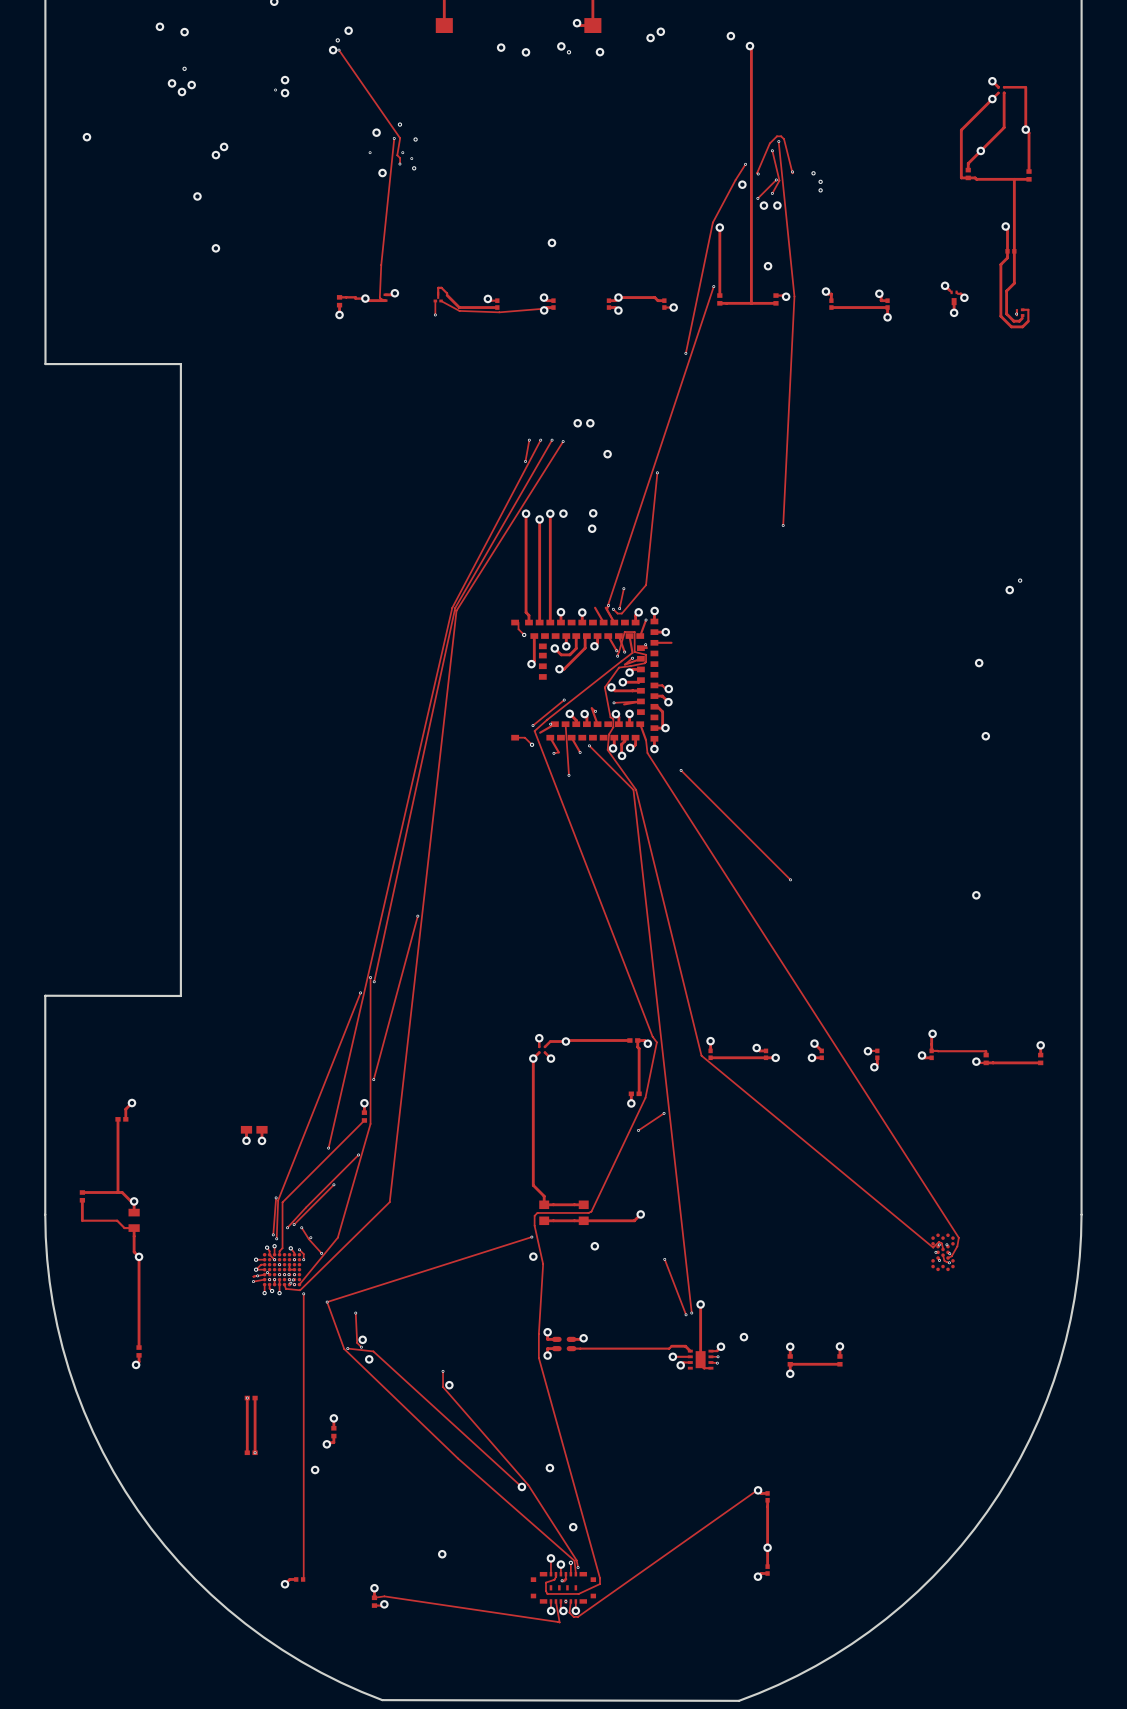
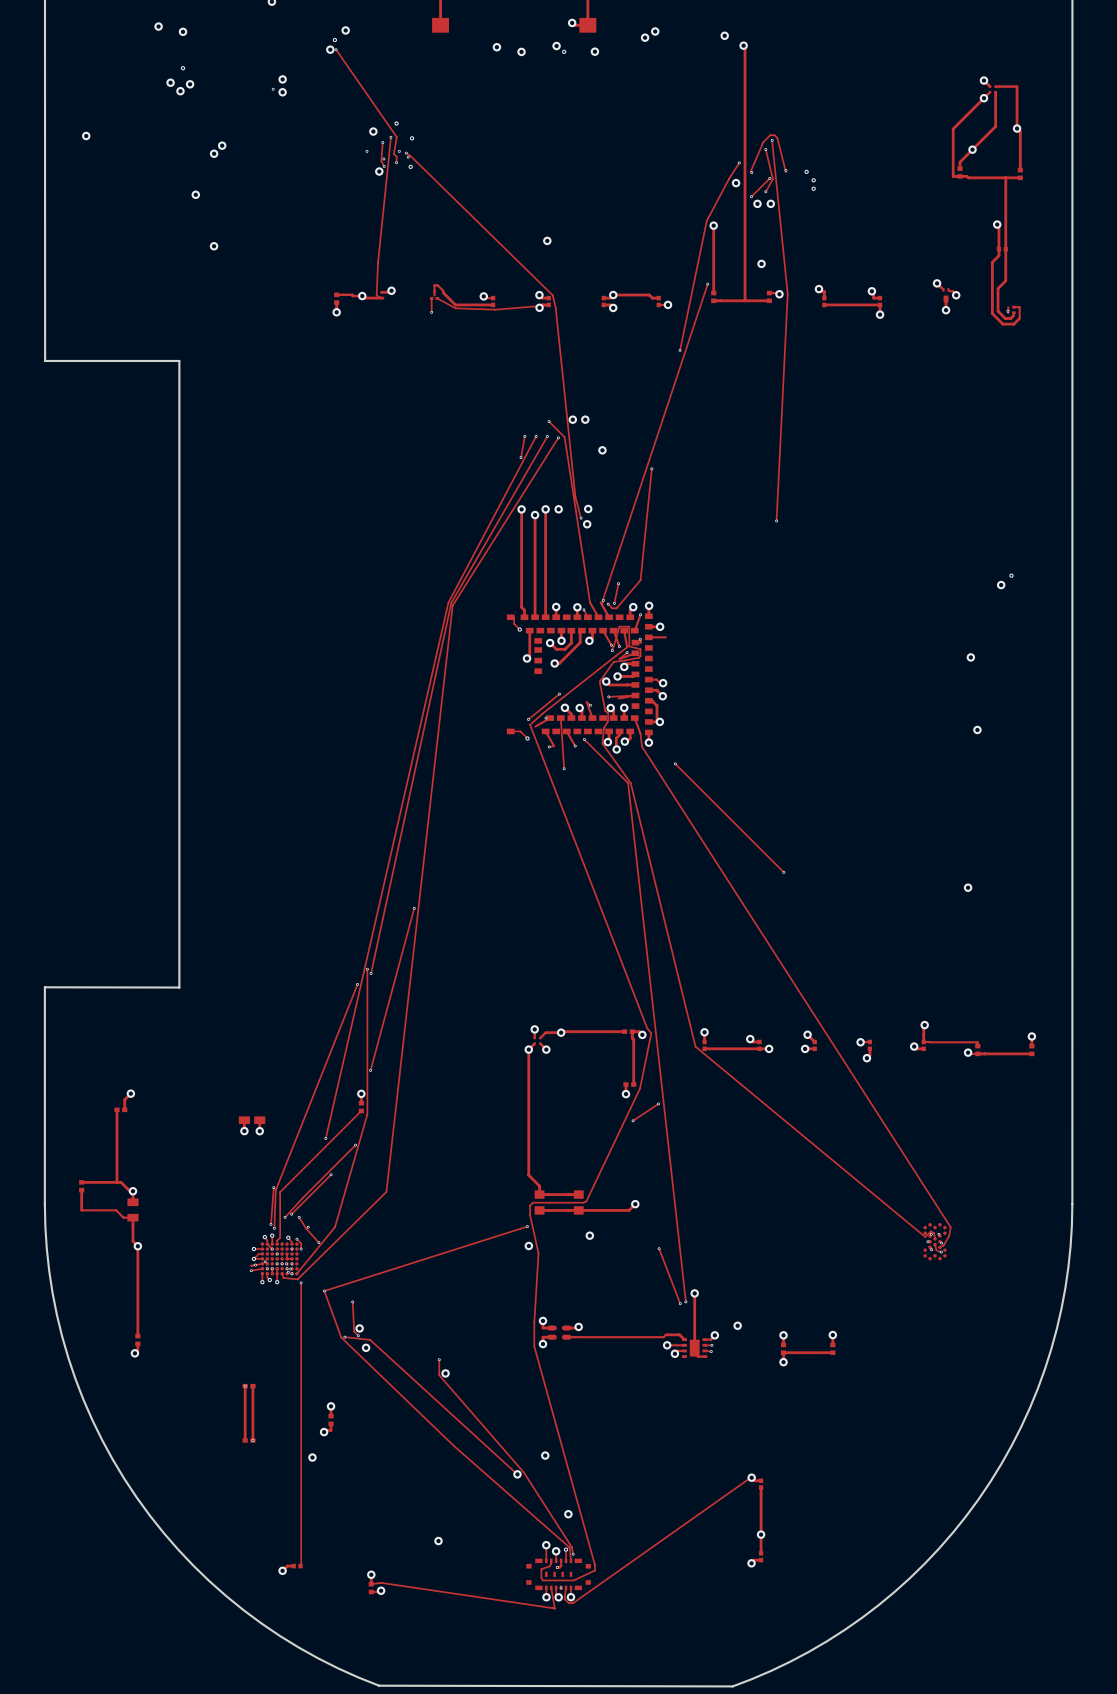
track: none -> (382, 142) (381, 160) (384, 166)
via: none -> (382, 142)
track: none -> (406, 153) (552, 295) (575, 497) (581, 518)
via: none -> (406, 153)
via: none -> (383, 158)
via: none -> (384, 166)
track: none -> (549, 421) (564, 437) (590, 602)
via: none -> (549, 421)
via: none -> (581, 518)
track: none -> (583, 609) (587, 617)
via: none -> (583, 609)

